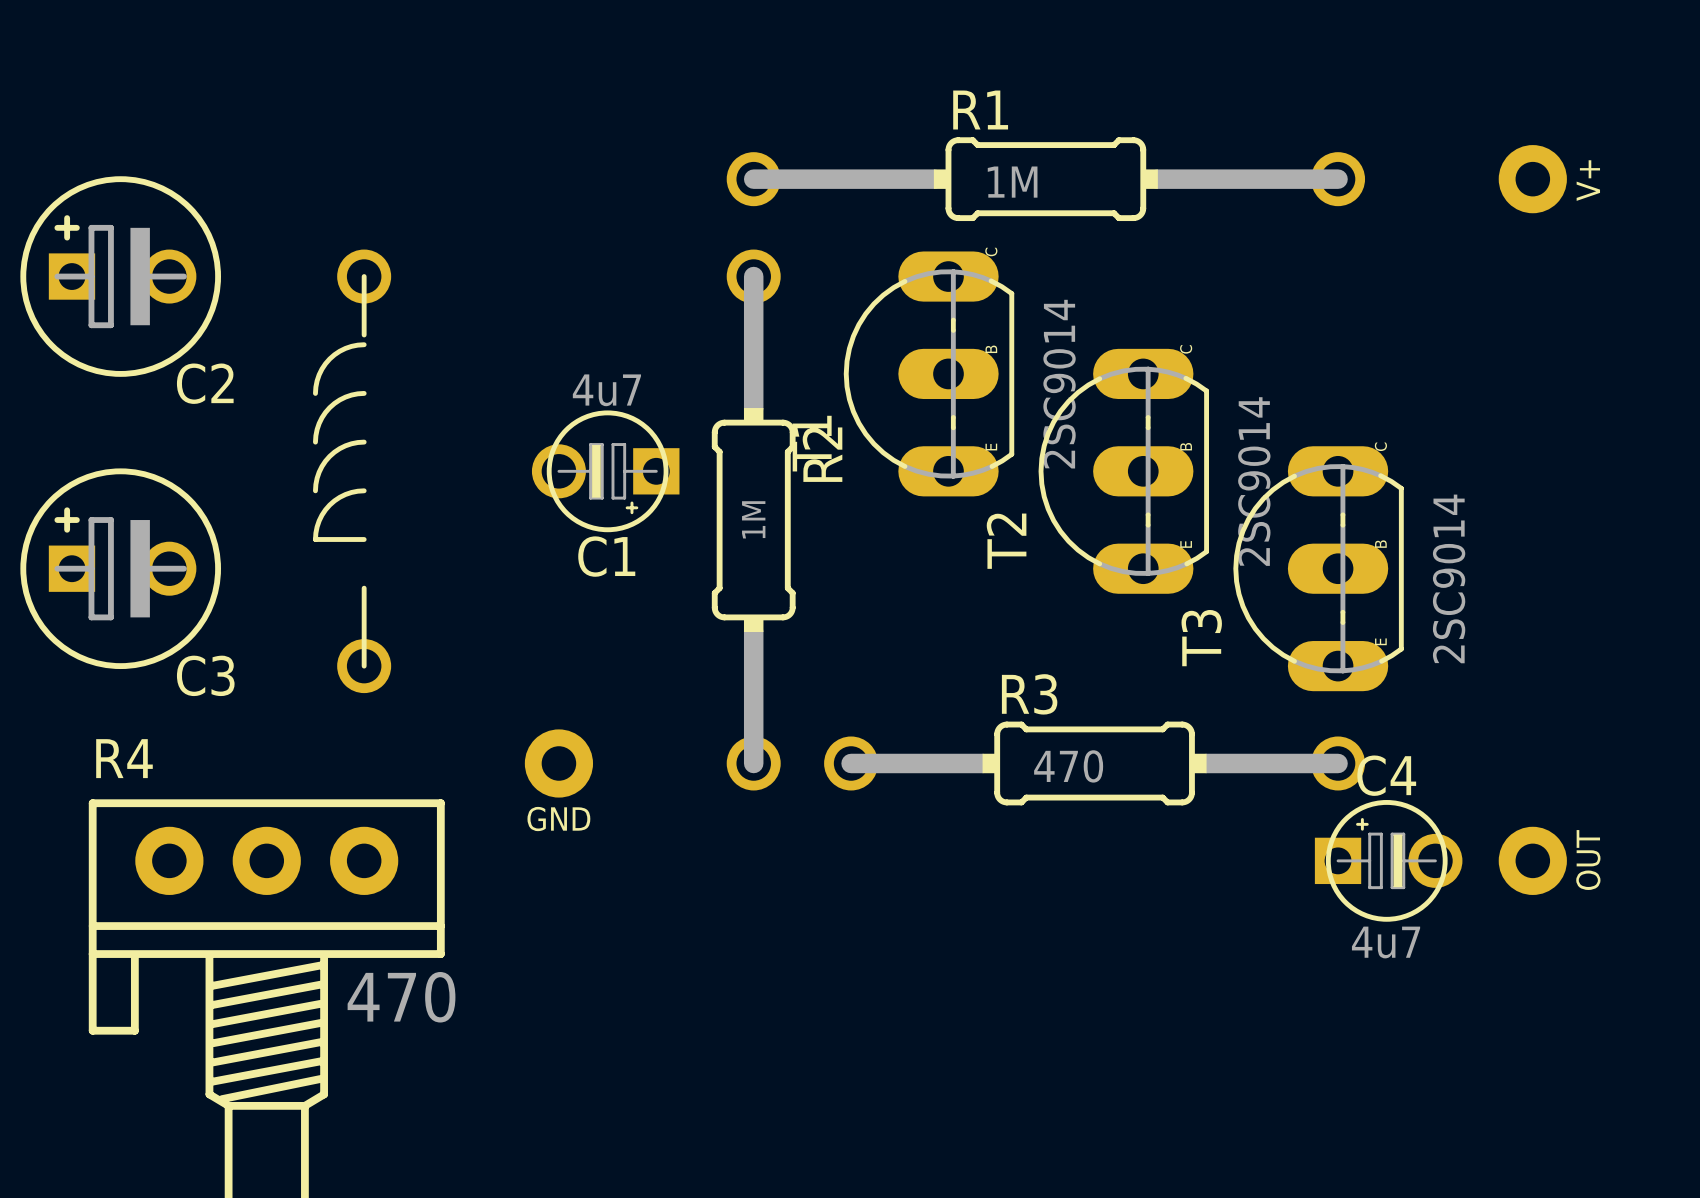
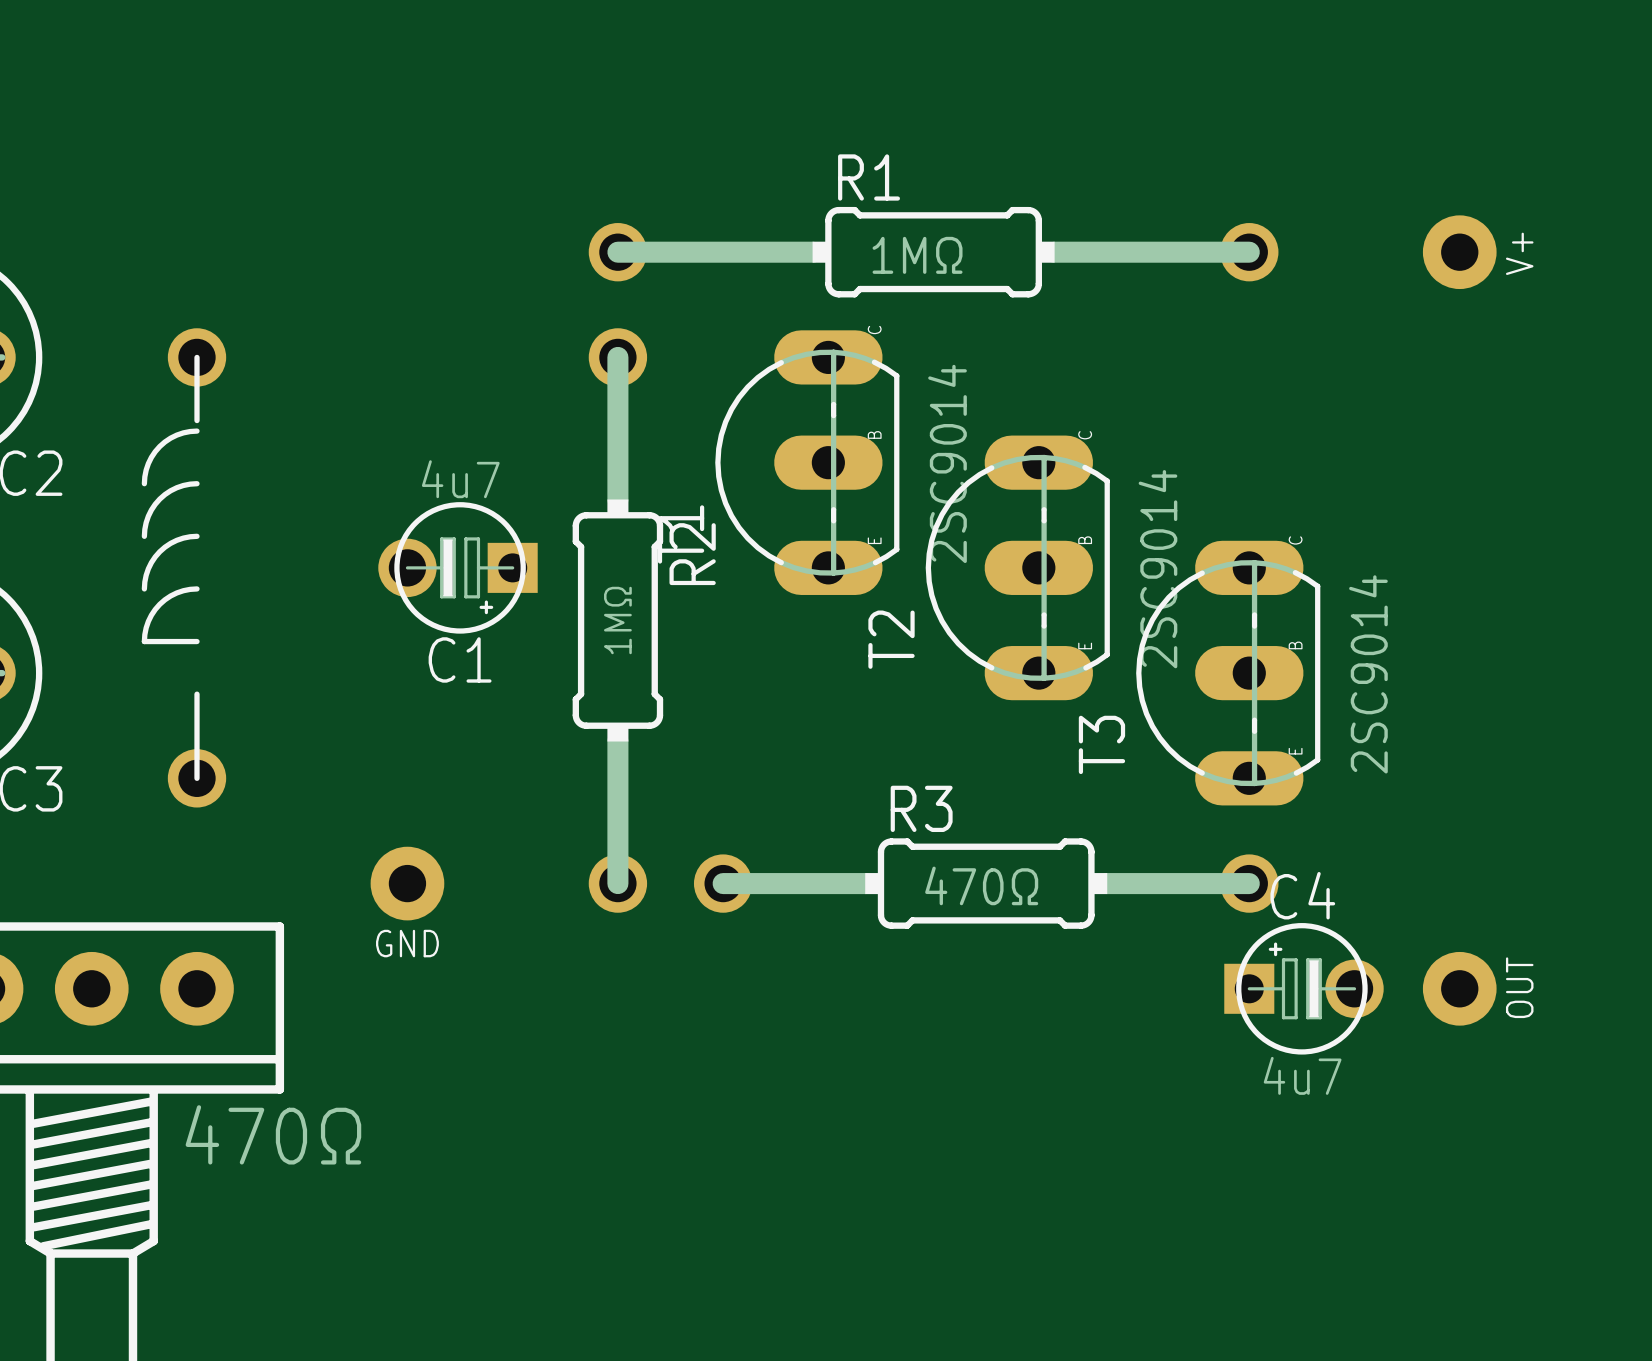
R1 value: 1M (1012, 182) -> 1MΩ (917, 255)
R2 value: 1M (753, 519) -> 1MΩ (617, 620)
R3 value: 470 (1068, 766) -> 470Ω (981, 885)
R4 value: 470 (401, 997) -> 470Ω (273, 1134)

